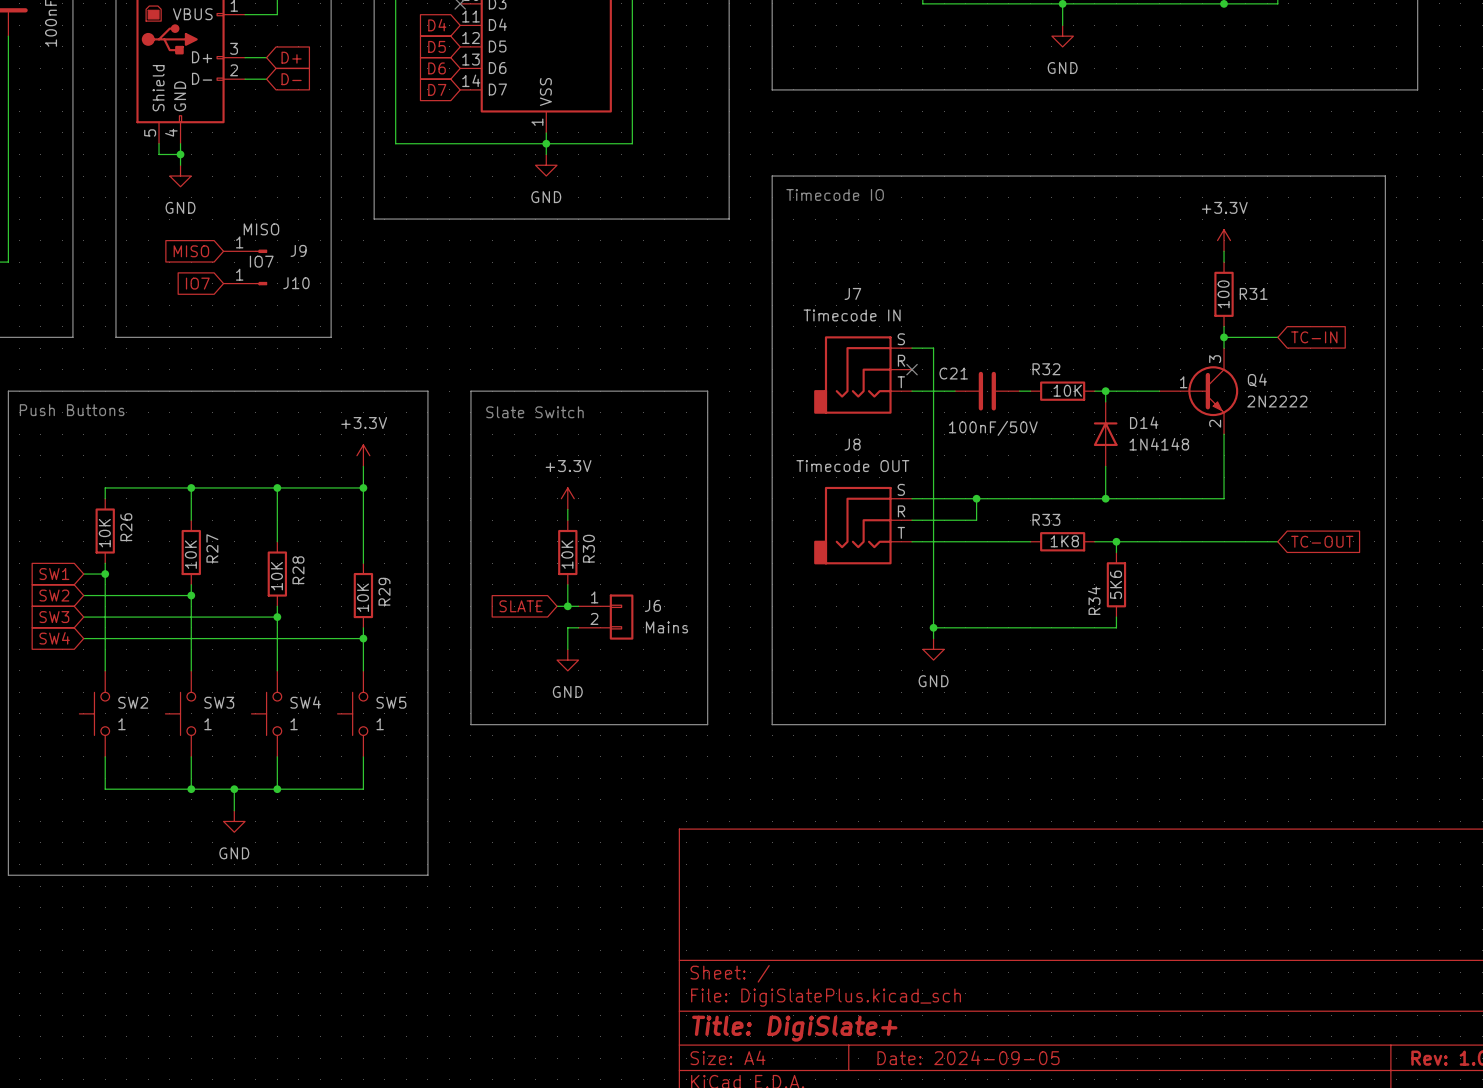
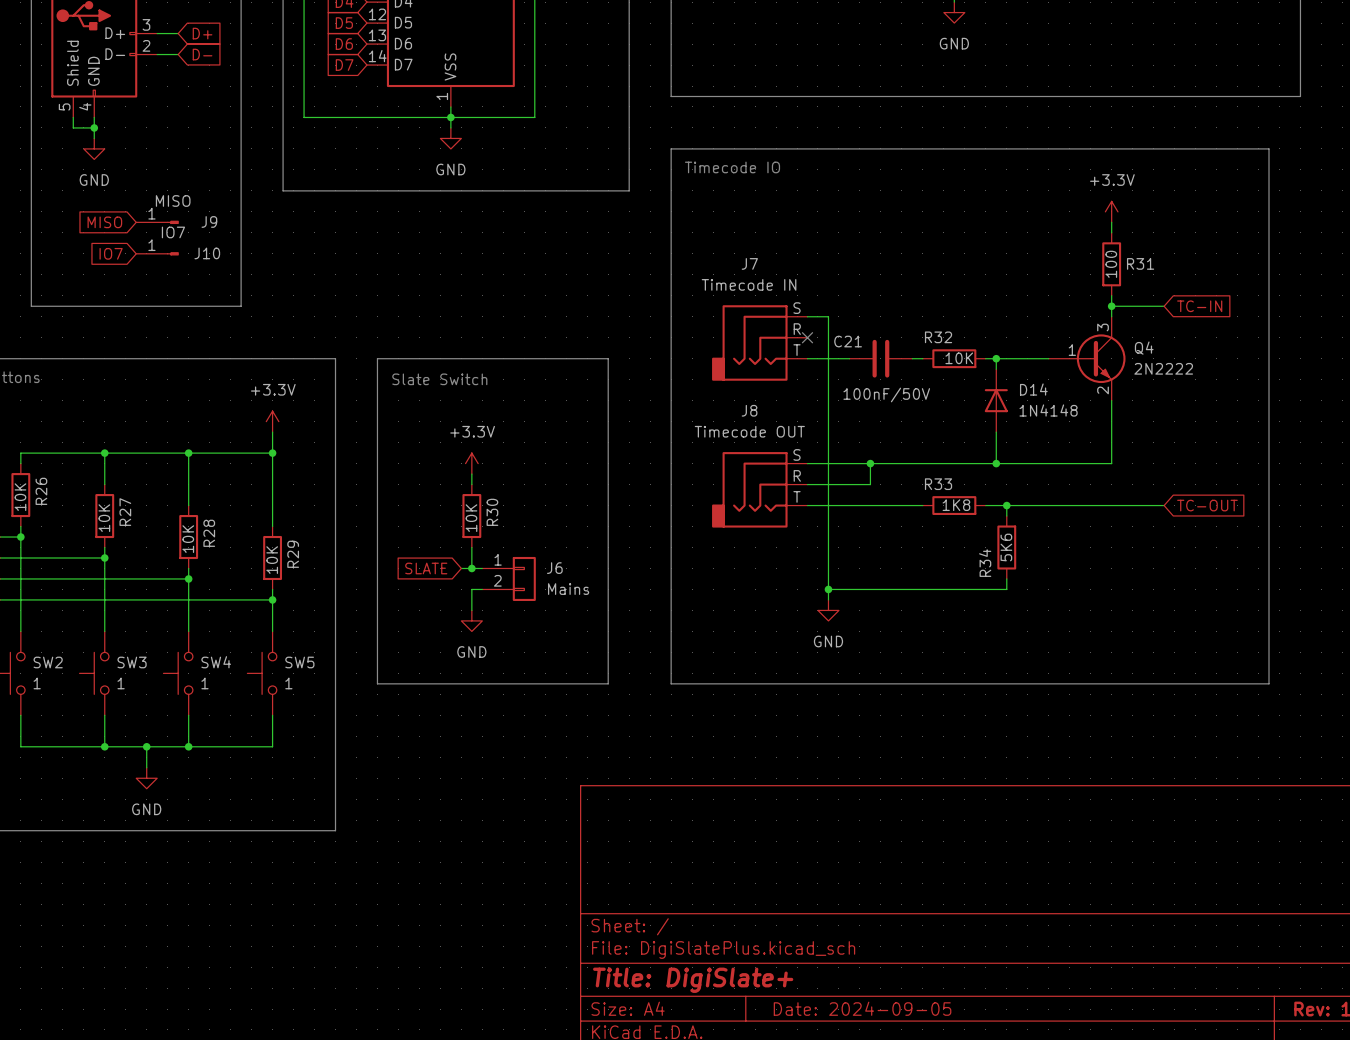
line: (772, 89) (1417, 89) -> (671, 65) (671, 96) (1300, 96) (1300, 65)

